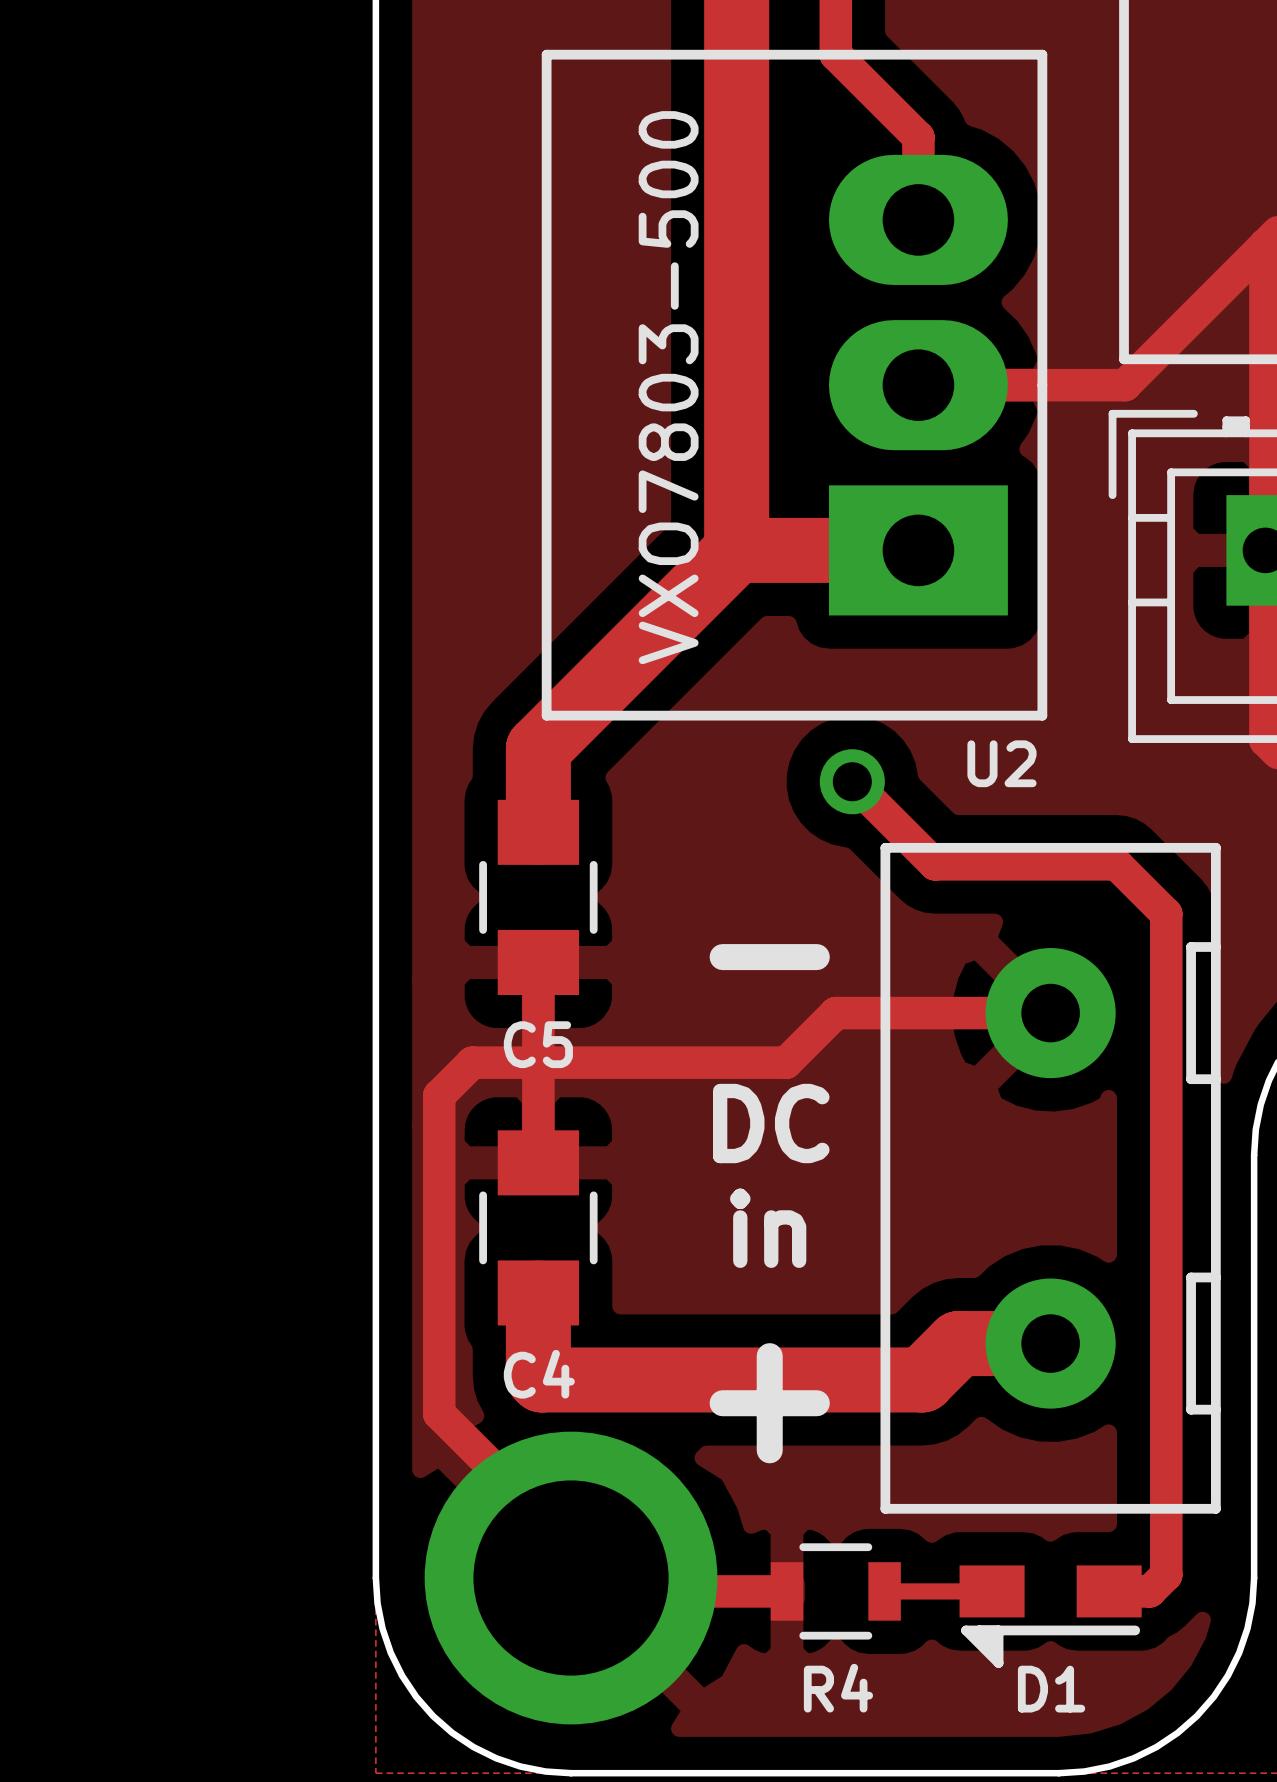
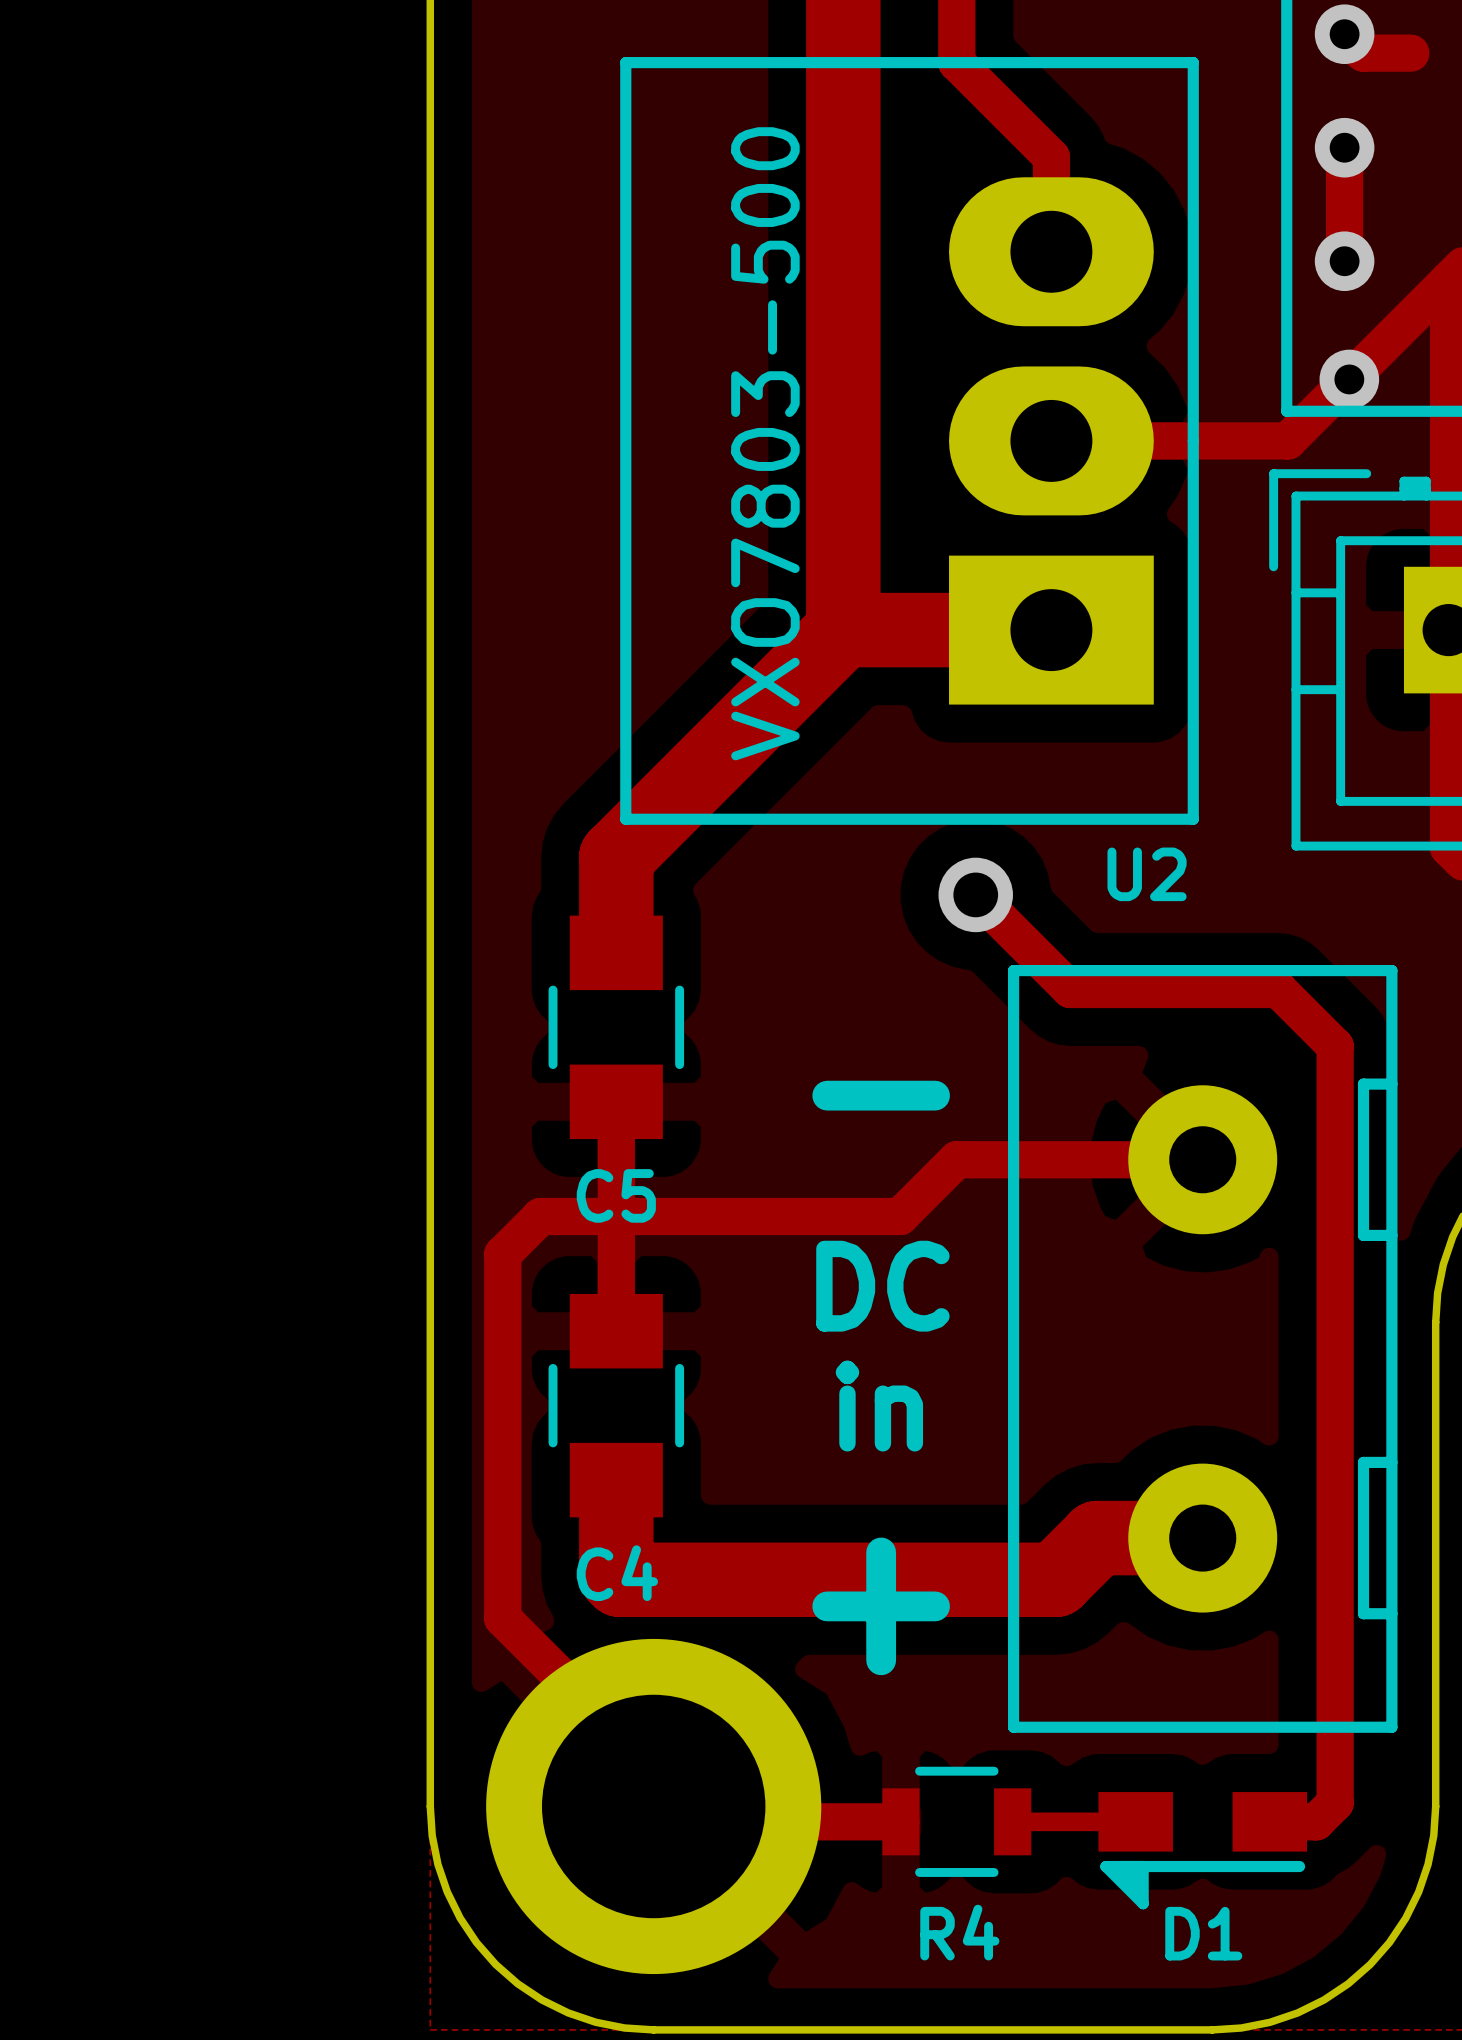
track: none -> (1344, 34) (1363, 53) (1410, 53)
via: none -> (1344, 34)
track: none -> (1344, 147) (1344, 261)
via: none -> (1344, 147)
via: none -> (1344, 261)
via: none -> (1349, 379)

